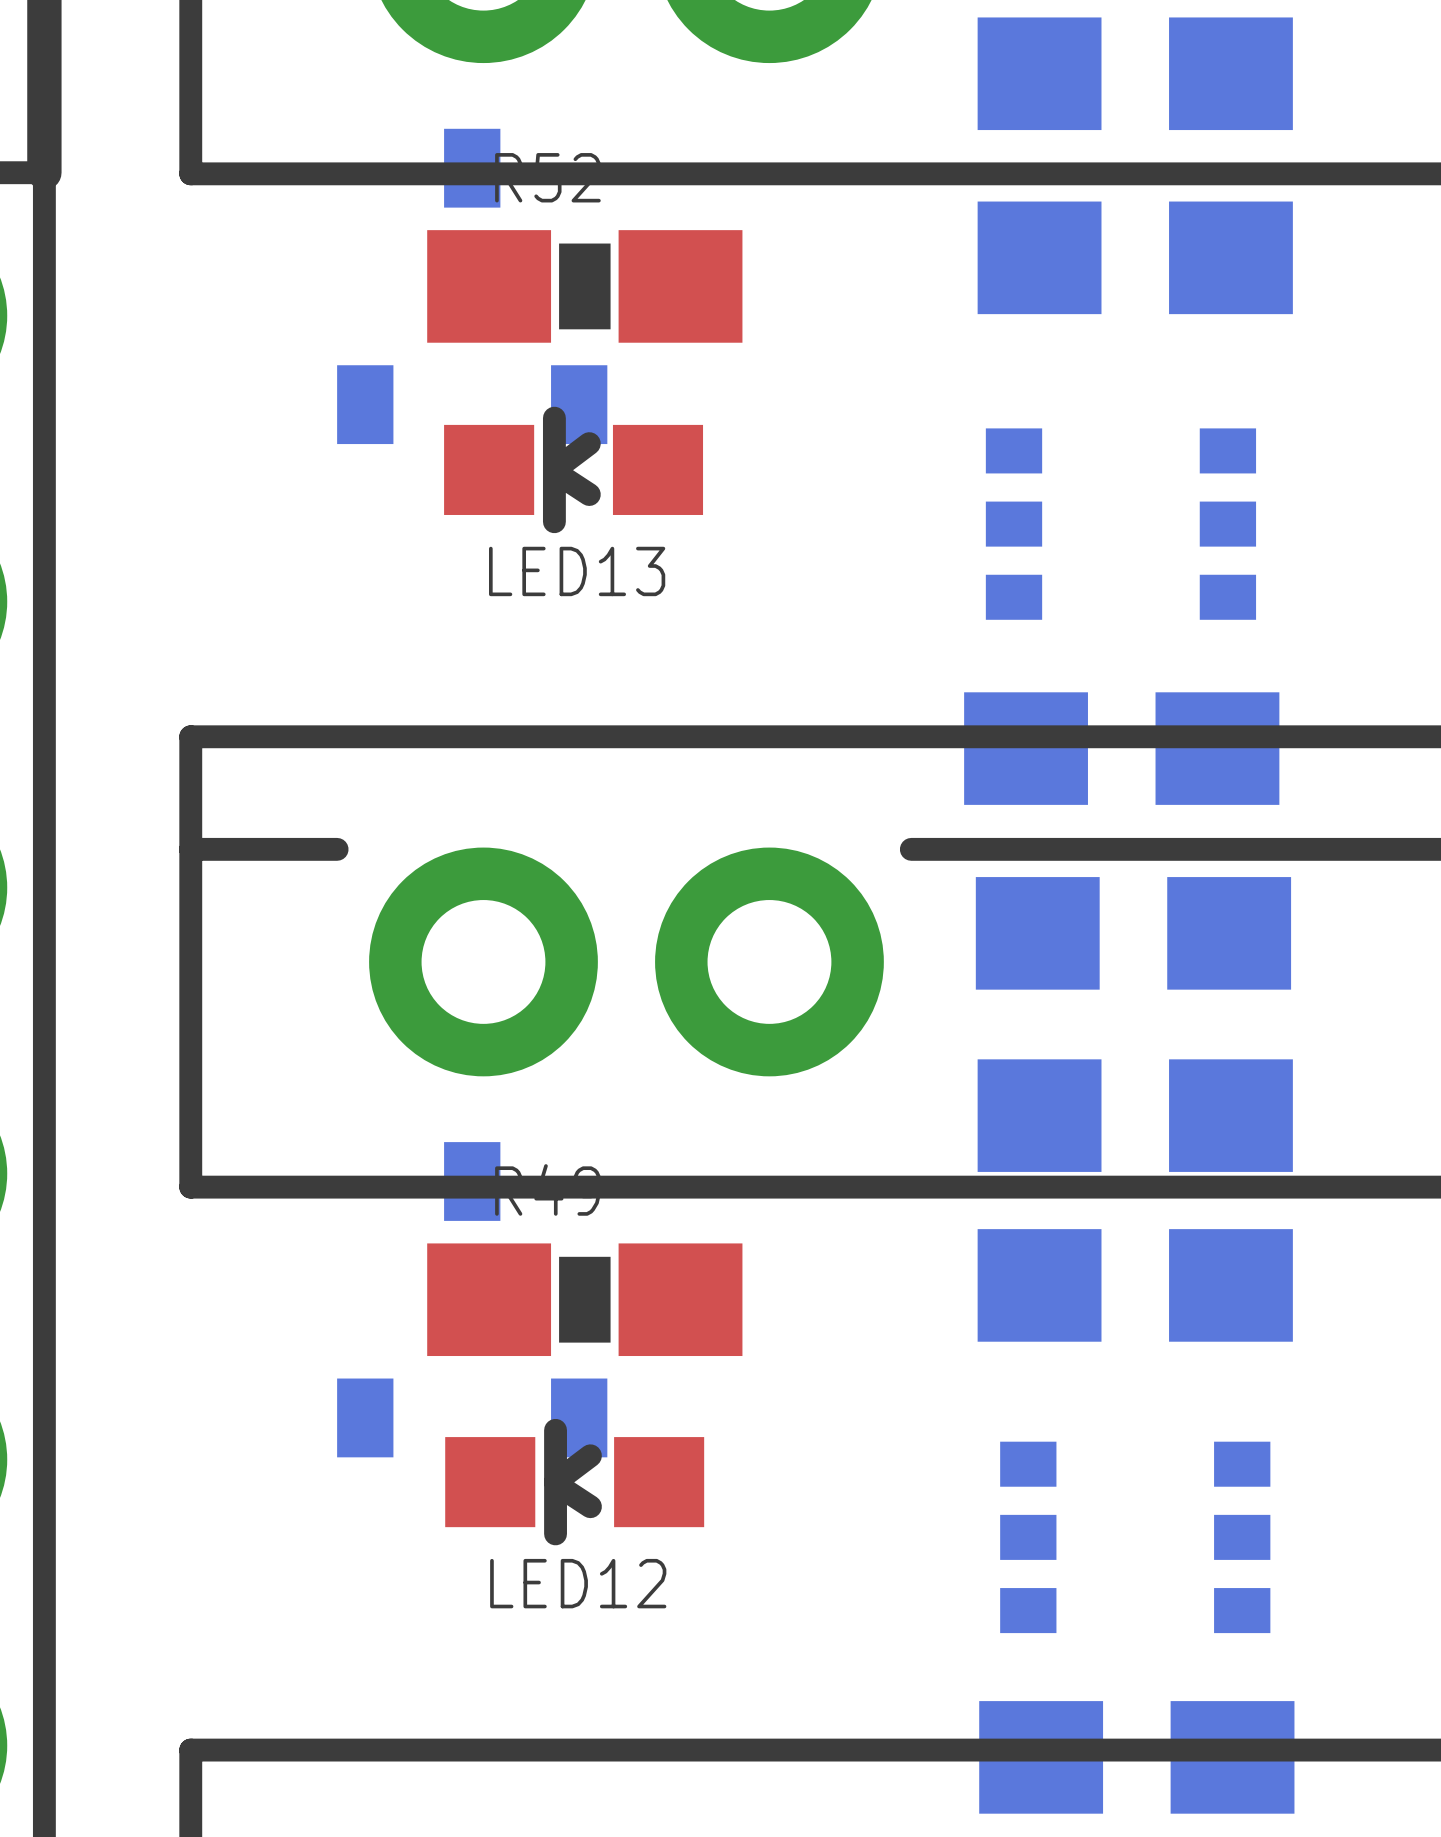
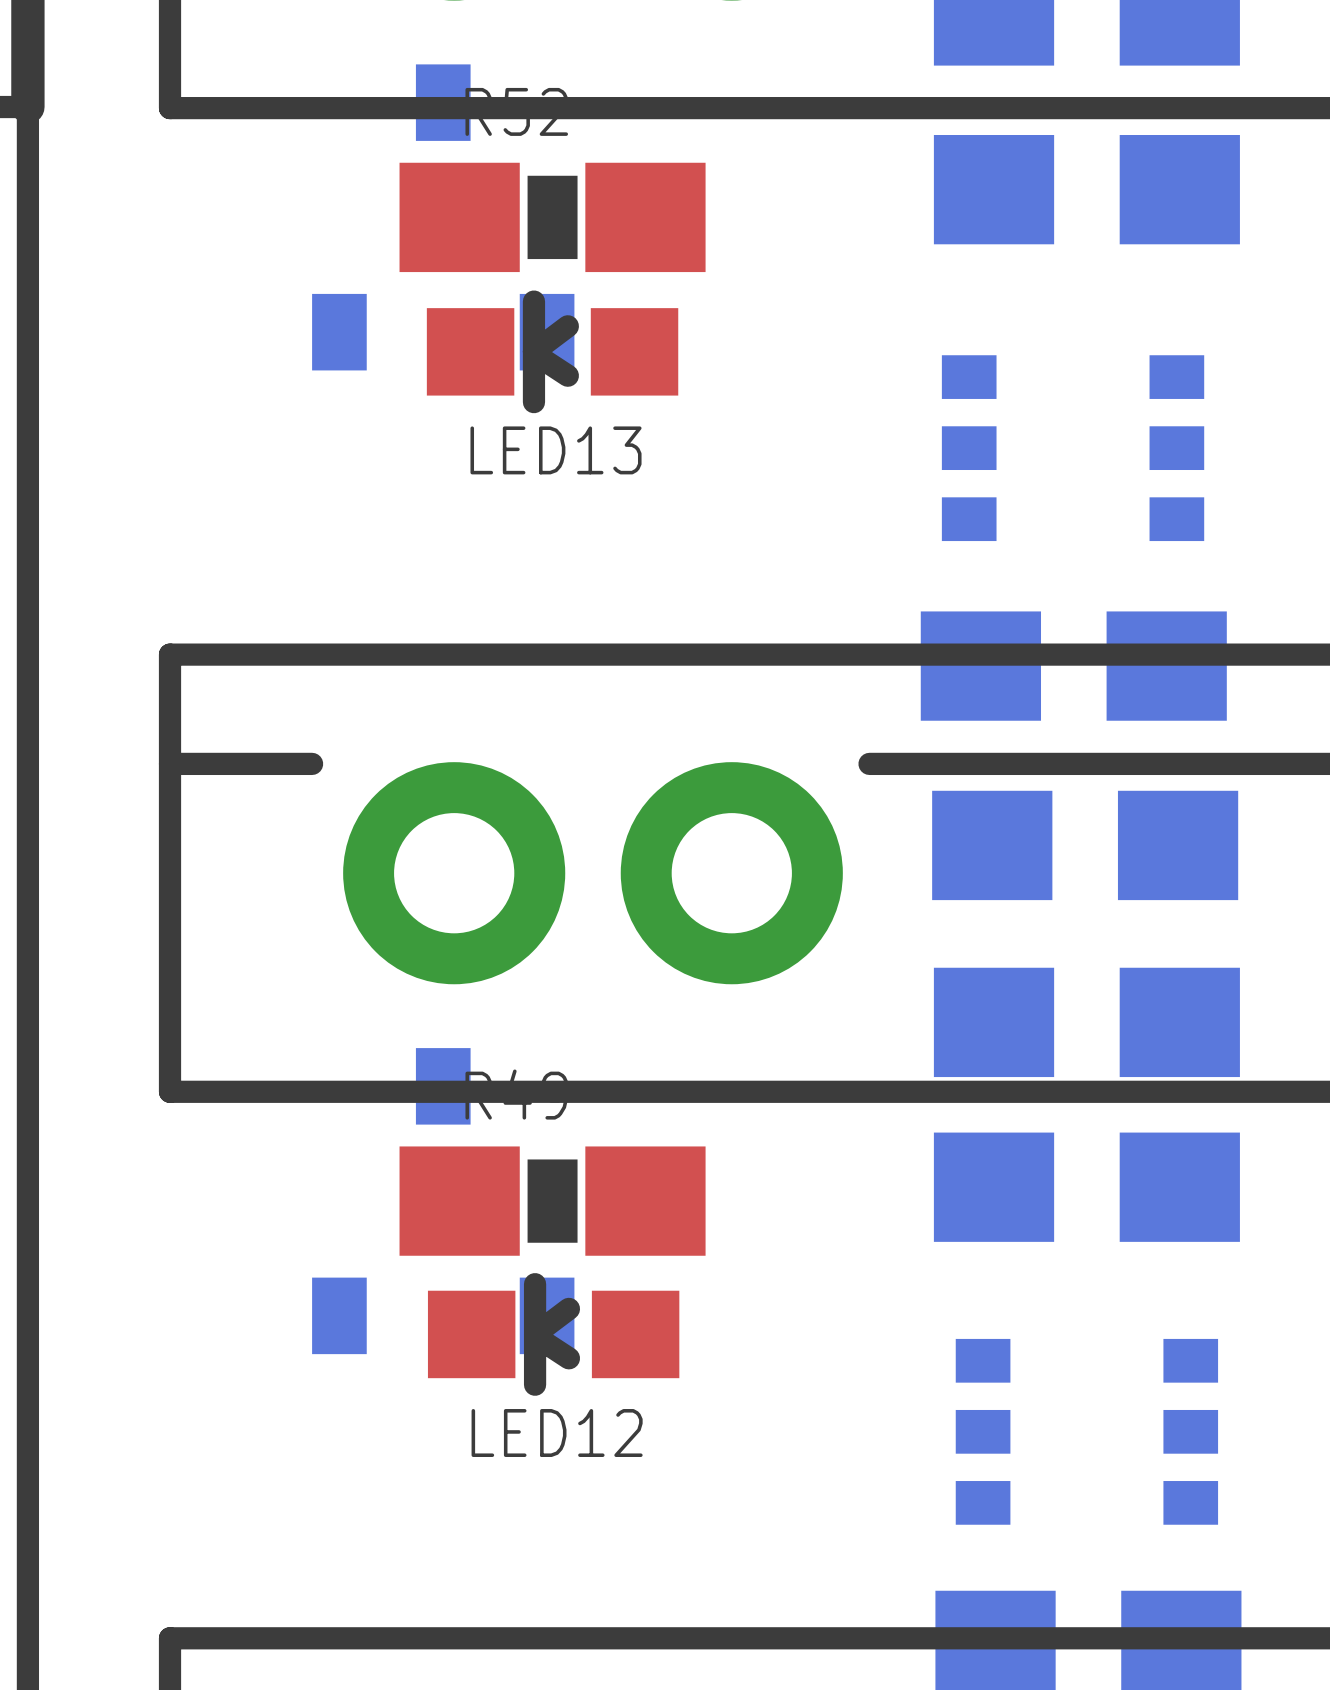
LED13 position: (573, 469) -> (552, 351)
LED12 position: (574, 1482) -> (553, 1334)

